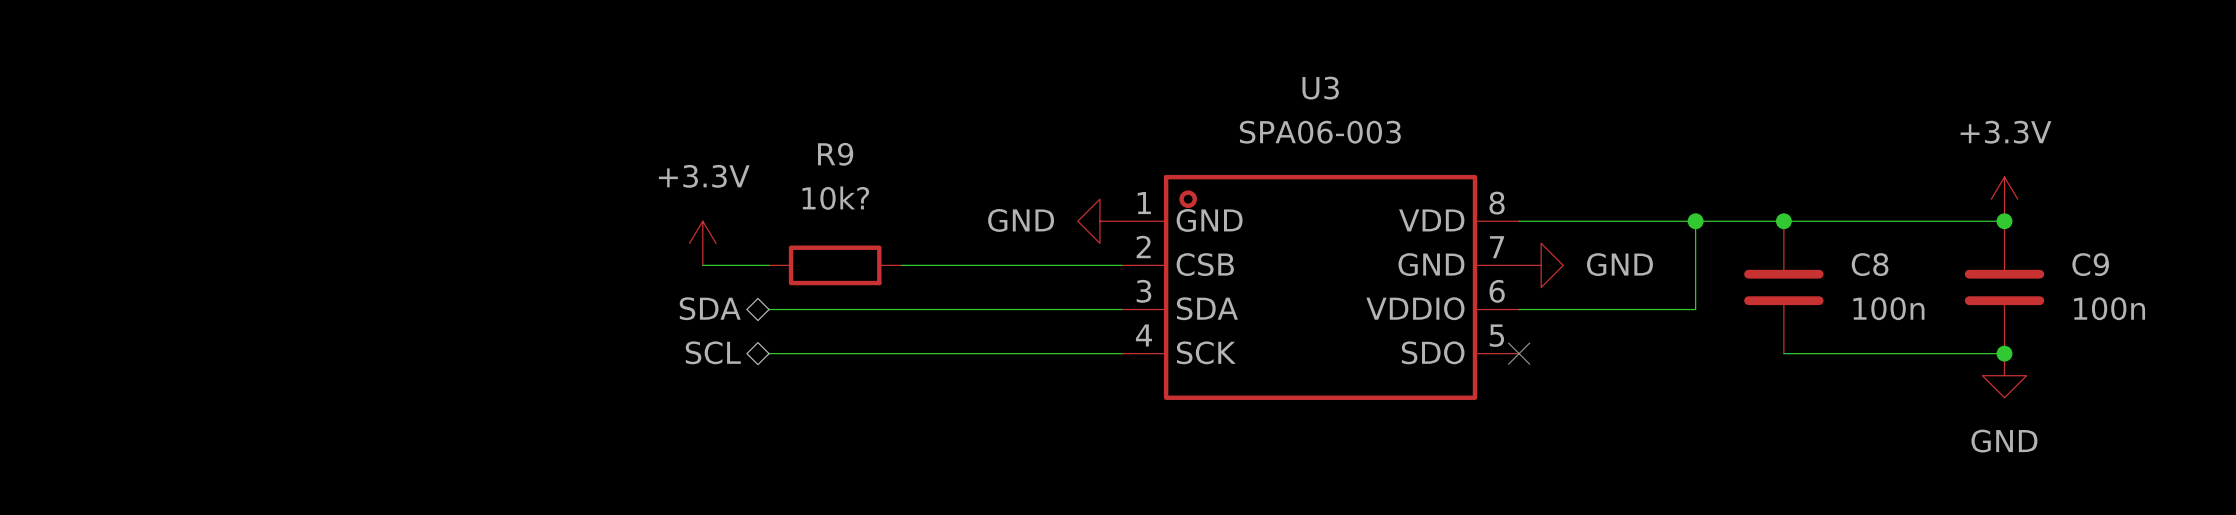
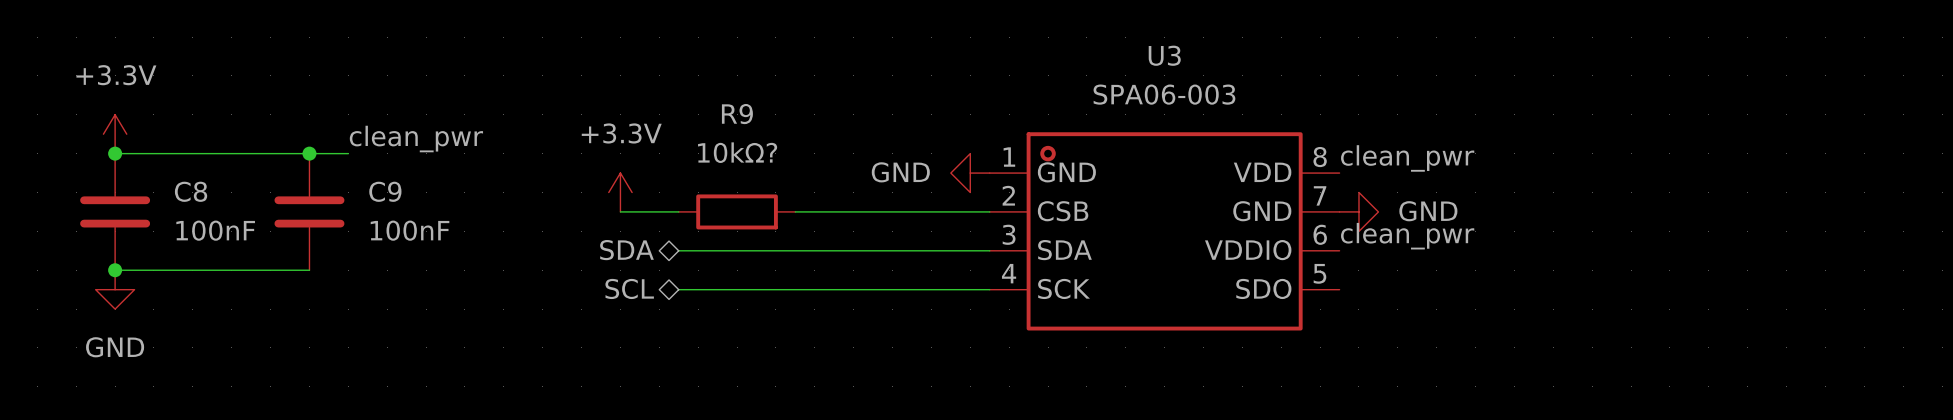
power symbol: none -> +3.3V (115, 134)
label: none -> clean_pwr (416, 139)
R9 value: 10k? (835, 198) -> 10kΩ? (737, 152)
wire: none -> (115, 153) (348, 153)
junction: none -> (115, 153)
junction: none -> (309, 153)
power symbol: +3.3V (2004, 199) -> none
label: none -> clean_pwr (1407, 158)
wire: (1519, 221) (2004, 221) -> none
wire: (1695, 221) (1695, 309) (1519, 309) -> none
junction: (1695, 221) -> none
junction: (1783, 221) -> none
junction: (2004, 221) -> none
C8 position: (1783, 287) -> (115, 211)
C9 position: (2004, 287) -> (309, 211)
label: none -> clean_pwr (1407, 236)
C8 value: 100n (1888, 308) -> 100nF (215, 230)
C9 value: 100n (2109, 308) -> 100nF (410, 230)
wire: none -> (115, 270) (309, 270)
junction: none -> (115, 270)
power symbol: none -> GND (115, 289)
no-connect mark: (1519, 353) -> none
wire: (1783, 353) (2004, 353) -> none
junction: (2004, 353) -> none
power symbol: GND (2004, 375) -> none

